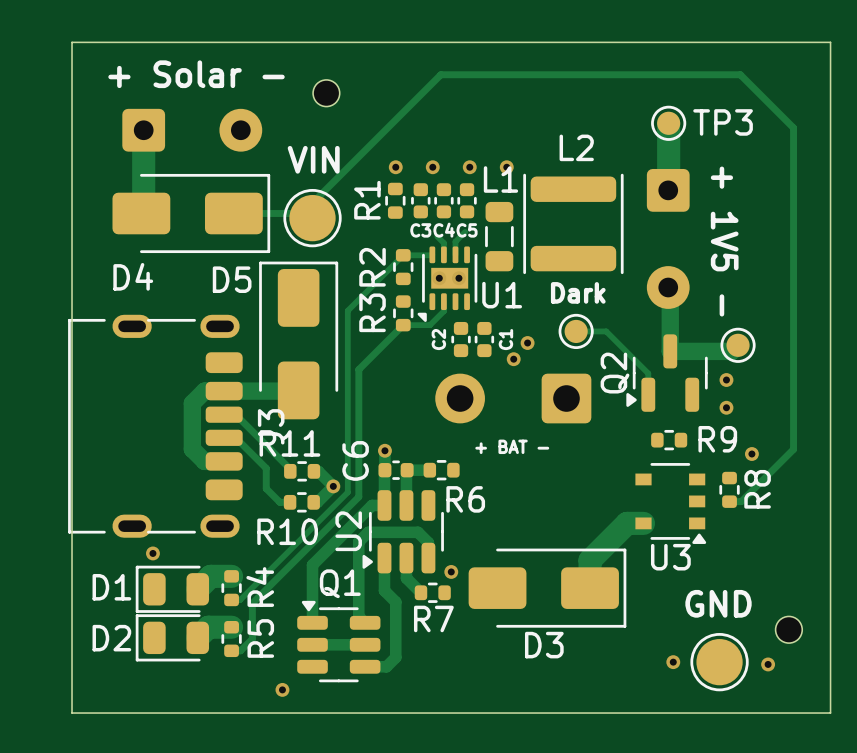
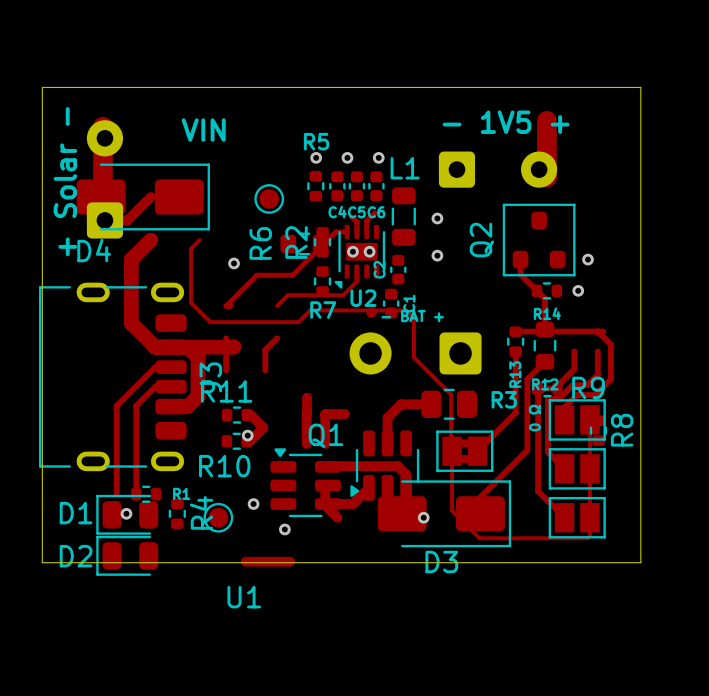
text rotation: 0° (196, 74) -> 90° counterclockwise (65, 181)
board edge: (72, 83) (72, 42) (830, 42) (830, 713) (72, 713) (72, 645) -> (42, 87) (640, 87) (640, 562) (42, 562)
part: (326, 93) -> none
TP3: (668, 123) -> none
text: none -> - 1V5 + (506, 122)
part rotation: 0° (192, 130) -> 90° counterclockwise (104, 179)
text position: VIN (313, 159) -> VIN (203, 130)
via: (506, 167) -> none
R1 name: R1 (367, 200) -> R5 (316, 141)
track: none -> (150, 196) (127, 220) (93, 220)
track: (233, 213) (302, 213) (440, 74) (740, 74) (793, 127) (793, 449) (741, 501) (729, 501) -> none
part: none -> (269, 198)
part: (312, 218) -> none
L2: (573, 223) -> none
C3 name: C3 (420, 230) -> C4 (337, 212)
C4 name: C4 (444, 230) -> C5 (356, 212)
C5 name: C5 (467, 230) -> C6 (376, 212)
via: none -> (437, 218)
part rotation: 0° (668, 238) -> 90° counterclockwise (498, 169)
text: + 1V5 - (724, 241) -> none
track: (431, 255) (403, 255) (347, 310) (347, 492) (240, 599) (231, 599) -> (347, 231) (335, 231) (292, 275) (257, 275) (226, 306) (230, 306)
track: none -> (150, 240) (131, 259) (131, 323) (155, 347)
track: none -> (199, 240) (190, 248) (190, 302) (210, 322) (298, 322) (310, 310) (406, 310) (413, 318) (413, 357) (451, 394) (452, 510) (479, 538) (587, 538) (589, 536) (589, 419)
via: none -> (437, 255)
track: none -> (520, 259) (520, 274) (544, 298) (544, 329)
via: none -> (588, 259)
track: (670, 289) (668, 287) (670, 289) (670, 351) (731, 351) (738, 345) -> none
via: none -> (234, 263)
text: Dark (578, 292) -> none
U1 name: U1 (502, 295) -> U2 (363, 298)
track: (443, 311) (430, 325) (403, 325) (358, 369) (358, 496) (252, 603) (252, 639) (240, 650) (231, 650) -> (356, 279) (343, 295) (287, 295) (277, 306)
R3 name: R3 (372, 312) -> R7 (323, 310)
R14: none -> (546, 290)
via: none -> (578, 290)
track: (576, 331) (606, 331) (648, 373) (648, 394) -> none
part: (576, 331) -> none
Q2 footprint: [626, 334, 708, 412] -> [502, 203, 576, 277]
C2 position: (461, 339) -> (398, 269)
D5: (298, 340) -> none
via: (527, 343) -> none
part: (738, 345) -> none
text: none -> - BAT + (412, 316)
via: (513, 359) -> none
track: none -> (515, 331) (603, 331)
track: none -> (597, 331) (610, 344) (610, 379) (595, 394) (576, 394) (564, 407) (564, 419)
track: none -> (226, 338) (226, 370)
track: none -> (277, 338) (265, 350) (265, 370)
via: (726, 380) -> none
R13: none -> (515, 341)
R12: none -> (544, 345)
track: (204, 391) (192, 403) (192, 449) (204, 461) (224, 461) -> (187, 347) (197, 357) (197, 396) (187, 406) (171, 406)
track: none -> (515, 351) (515, 413) (477, 451)
track: none -> (574, 351) (574, 369) (554, 388) (543, 388) (538, 394) (538, 491) (564, 517)
track: none -> (597, 351) (597, 374) (587, 385) (572, 385) (559, 398) (547, 398) (547, 452) (564, 468)
via: (726, 407) -> none
track: none -> (544, 361) (527, 379) (527, 450) (477, 500)
track: none -> (169, 367) (155, 367) (116, 405) (116, 494)
track: (235, 414) (289, 468) (289, 474) -> none
track: none -> (169, 386) (155, 386) (136, 405) (136, 494)
track: (235, 437) (266, 468) (266, 488) (279, 502) (290, 502) -> none
text: + BAT - (512, 446) -> none
via: (384, 450) -> none
via: (751, 454) -> none
track: none -> (431, 404) (401, 404) (387, 417) (387, 443)
R3: none -> (449, 404)
R6 footprint: [423, 460, 460, 481] -> [280, 232, 329, 256]
C6: (396, 470) -> none
text: none -> 0 Ω (534, 418)
part: none -> (577, 419)
via position: (333, 486) -> (247, 435)
R6 name position: R6 (465, 499) -> R6 (260, 243)
U3: (670, 503) -> none
track: (384, 514) (384, 505) (372, 505) (312, 565) (312, 622) -> none
part: none -> (464, 451)
track: (643, 523) (627, 523) (590, 560) (590, 588) -> none
U2: (403, 531) -> none
U1: none -> (384, 465)
track: none -> (327, 466) (397, 466) (406, 474) (406, 487)
part: none -> (577, 468)
via position: (152, 553) -> (126, 513)
track: none -> (368, 487) (352, 504) (327, 504)
track: (384, 558) (384, 590) (395, 602) (395, 657) (386, 666) (365, 666) -> none
track: (428, 558) (428, 542) (418, 532) (368, 532) (358, 541) (358, 616) (365, 622) -> none
R1: none -> (146, 494)
via: (451, 571) -> none
track: (231, 576) (210, 576) (197, 589) -> none
via: none -> (253, 504)
Q1 name position: Q1 (340, 583) -> Q1 (325, 435)
part: none -> (218, 517)
R7: (432, 592) -> none
via: none -> (423, 517)
part: none -> (577, 517)
text: GND (718, 603) -> none
via: none -> (284, 529)
track: (231, 627) (208, 627) (197, 637) -> none
part: (788, 629) -> none
R5: (231, 639) -> none
Q1 position: (338, 641) -> (305, 482)
via: (673, 662) -> none
part: (719, 662) -> none
via: (768, 664) -> none
via: (282, 689) -> none

